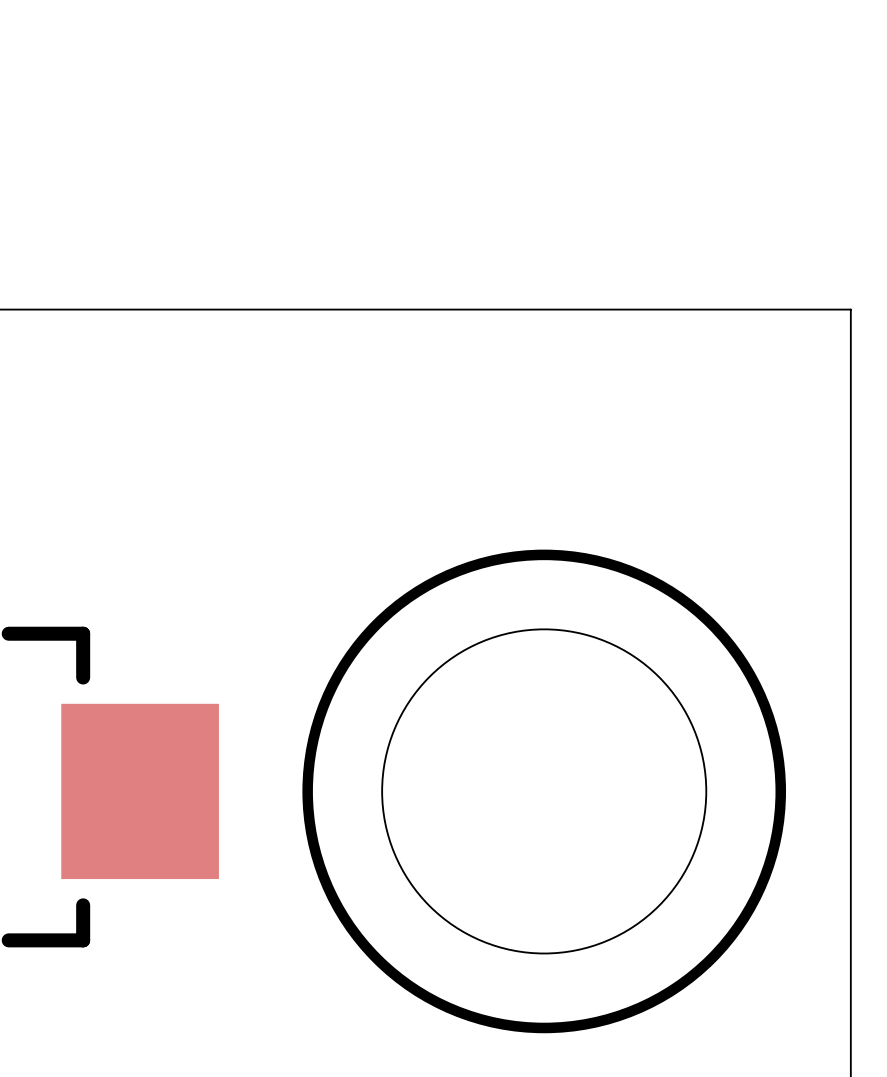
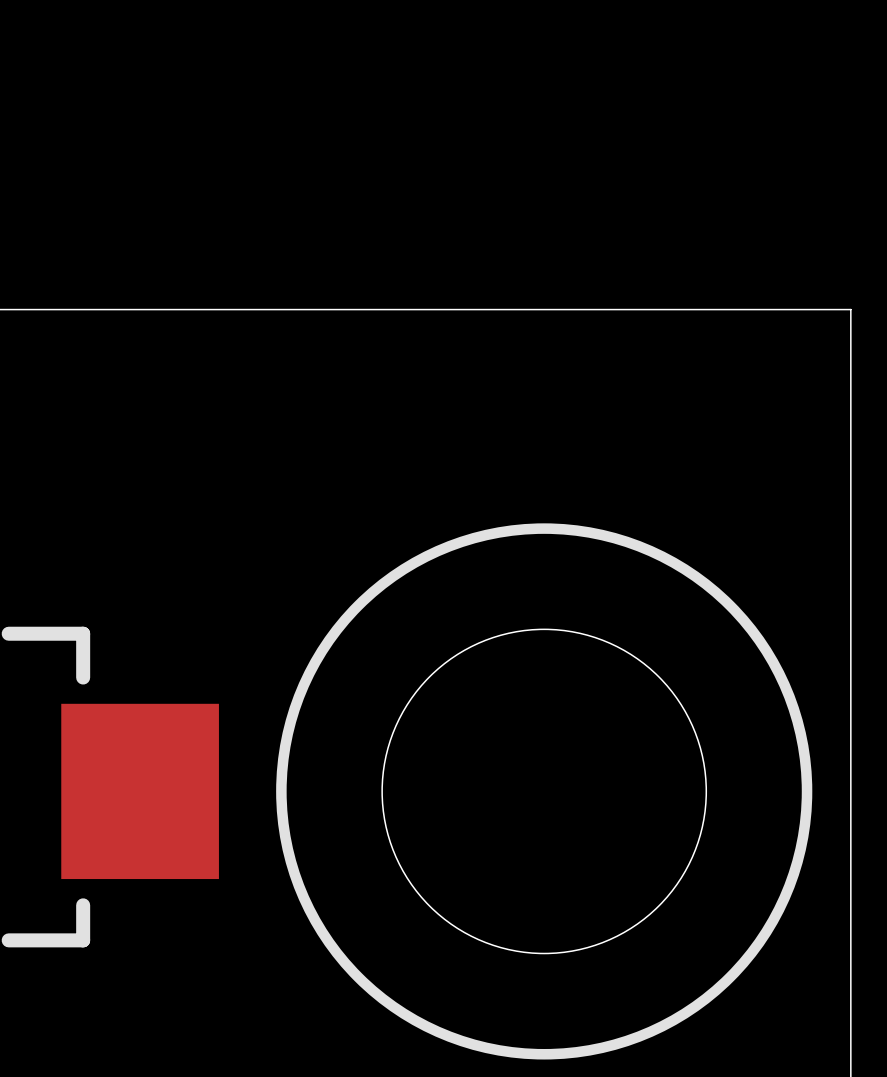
drawing shape: [302, 549, 787, 1034] -> [276, 523, 813, 1060]

